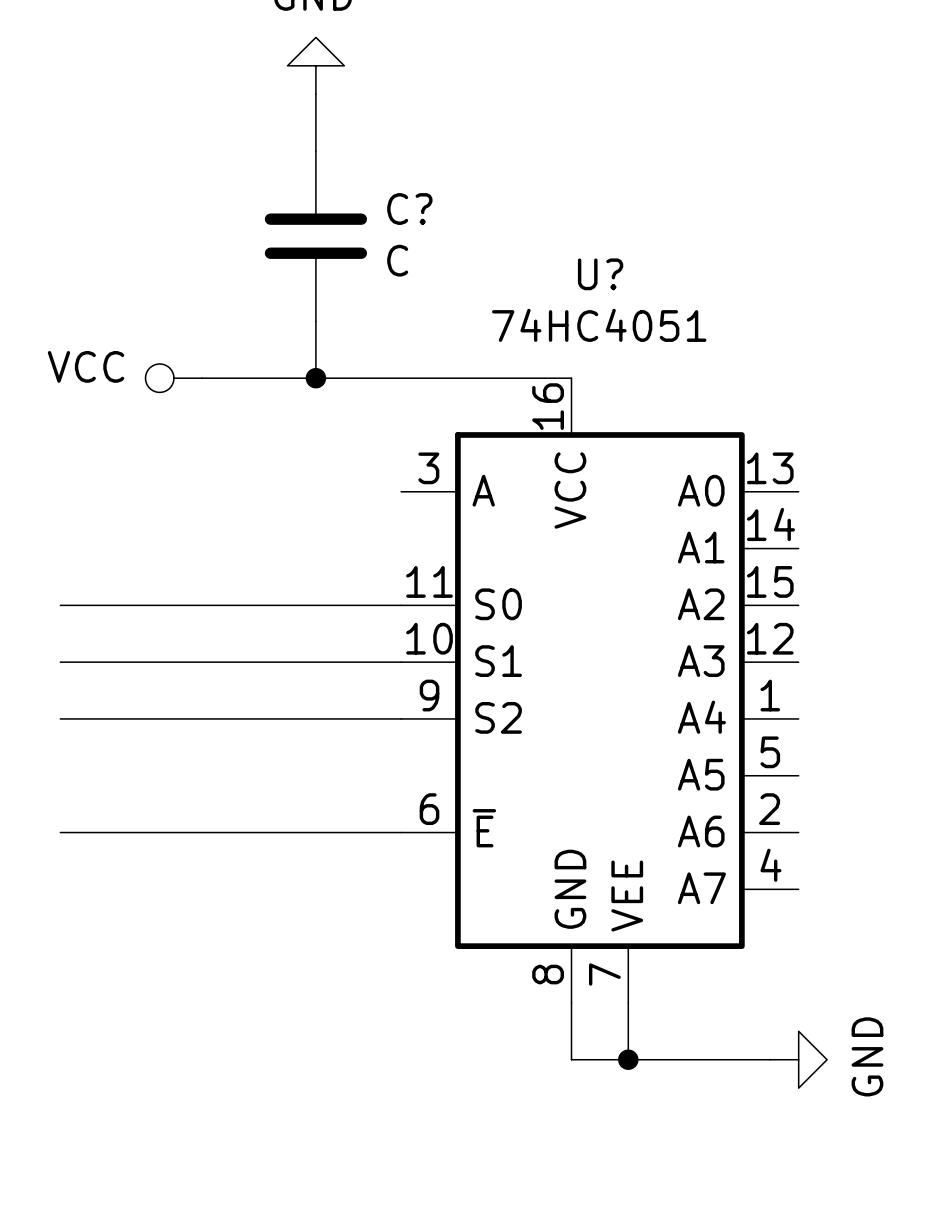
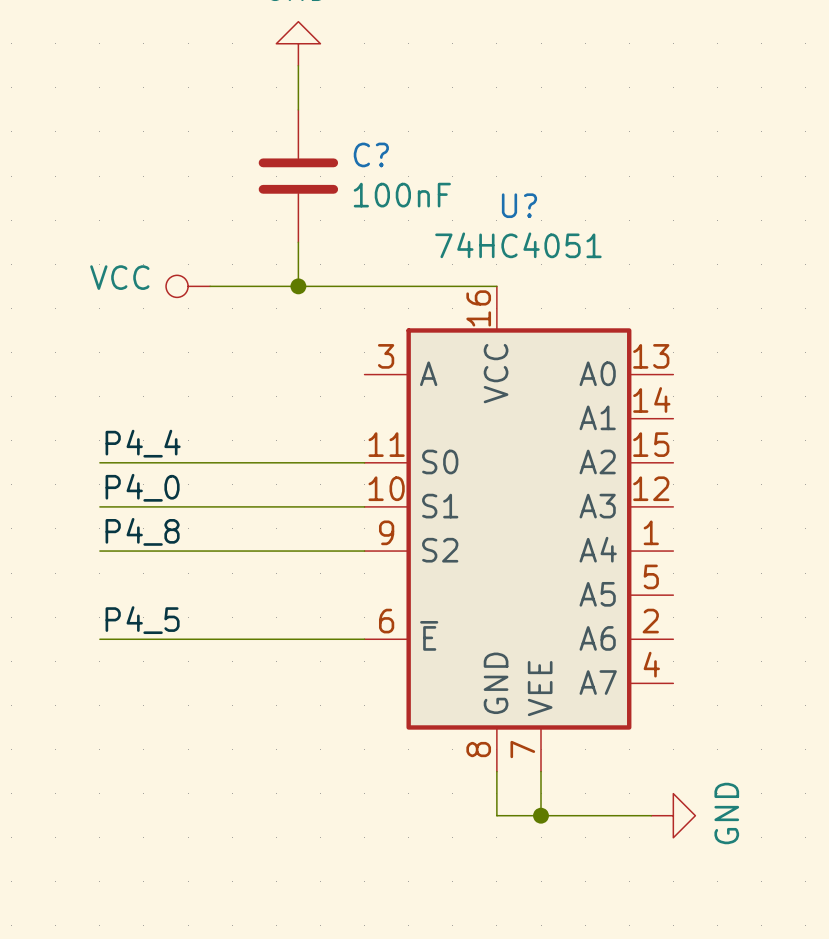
C? value: C (397, 260) -> 100nF (402, 195)
label: none -> P4_4 (143, 443)
label: none -> P4_0 (142, 487)
label: none -> P4_8 (142, 531)
label: none -> P4_5 (142, 620)

